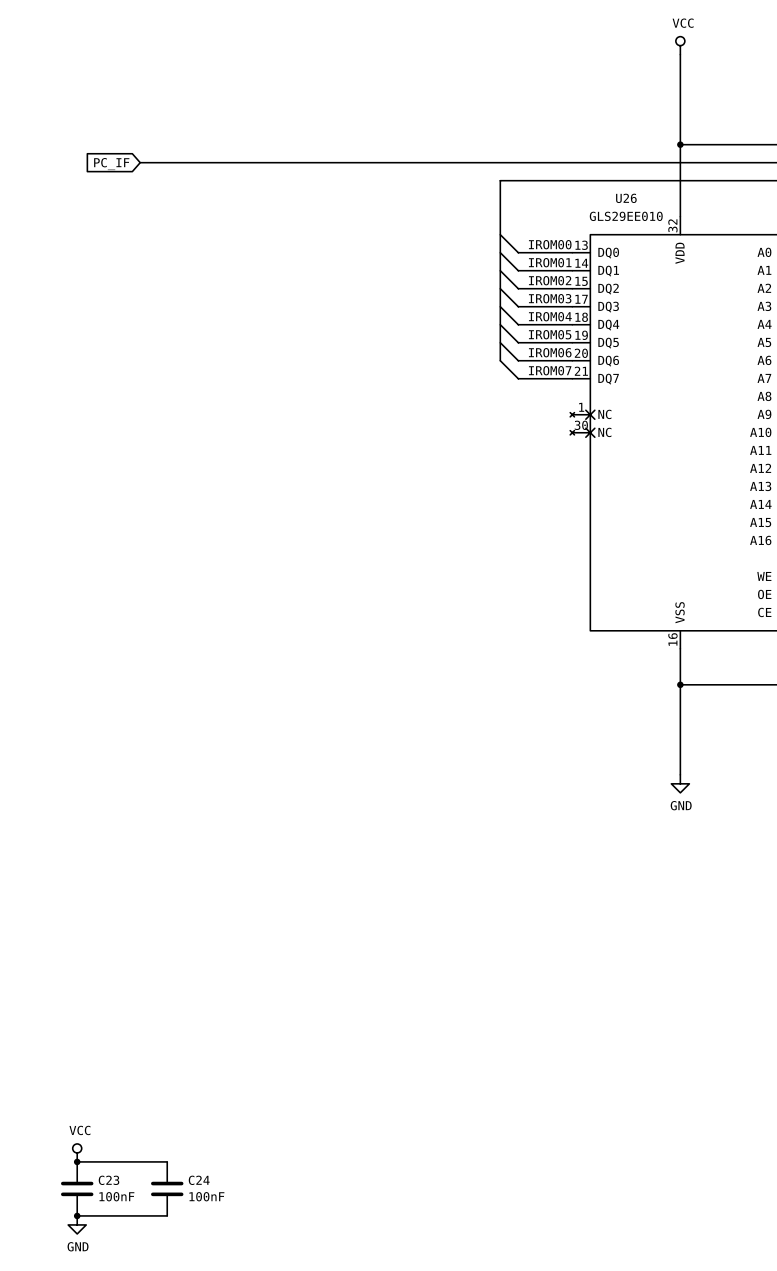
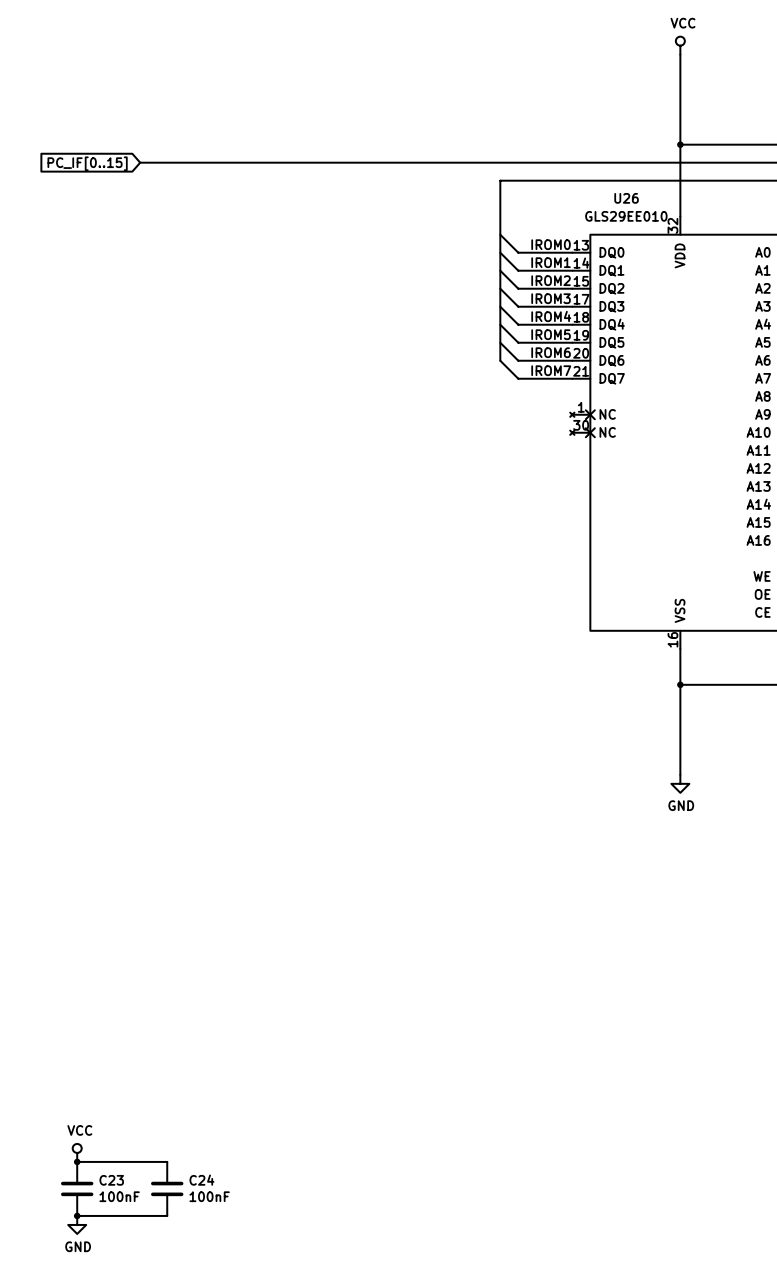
global label: PC_IF (111, 164) -> PC_IF[0..15] (87, 163)
label: IROM00 (550, 244) -> IROM0 (551, 244)
label: IROM01 (550, 262) -> IROM1 (551, 262)
label: IROM02 (550, 280) -> IROM2 (551, 280)
label: IROM03 (550, 298) -> IROM3 (551, 298)
label: IROM04 (550, 316) -> IROM4 (551, 316)
label: IROM05 (550, 334) -> IROM5 (551, 334)
label: IROM06 (550, 352) -> IROM6 (551, 352)
label: IROM07 (550, 370) -> IROM7 (551, 370)

